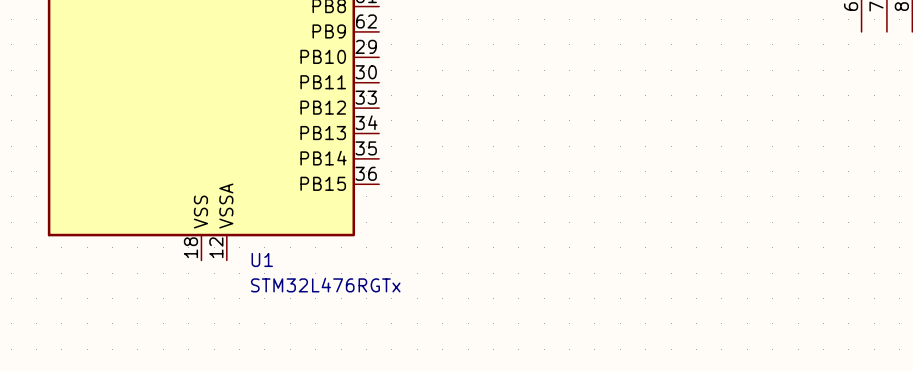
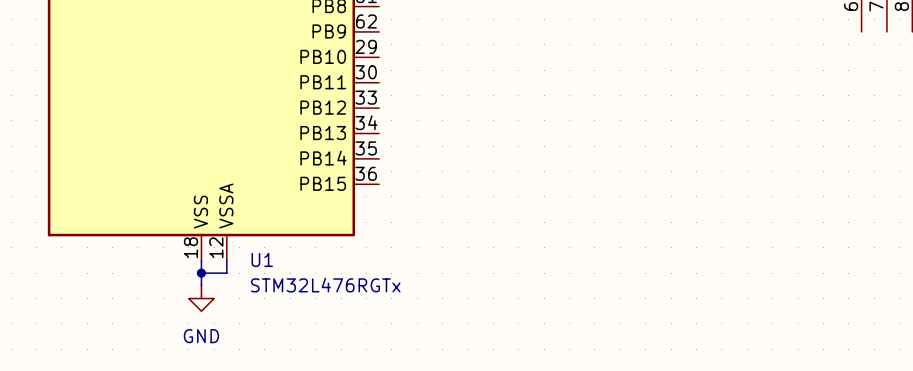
wire: none -> (201, 260) (201, 285)
wire: none -> (226, 260) (226, 273) (201, 273)
junction: none -> (201, 273)
power symbol: none -> GND (201, 298)

